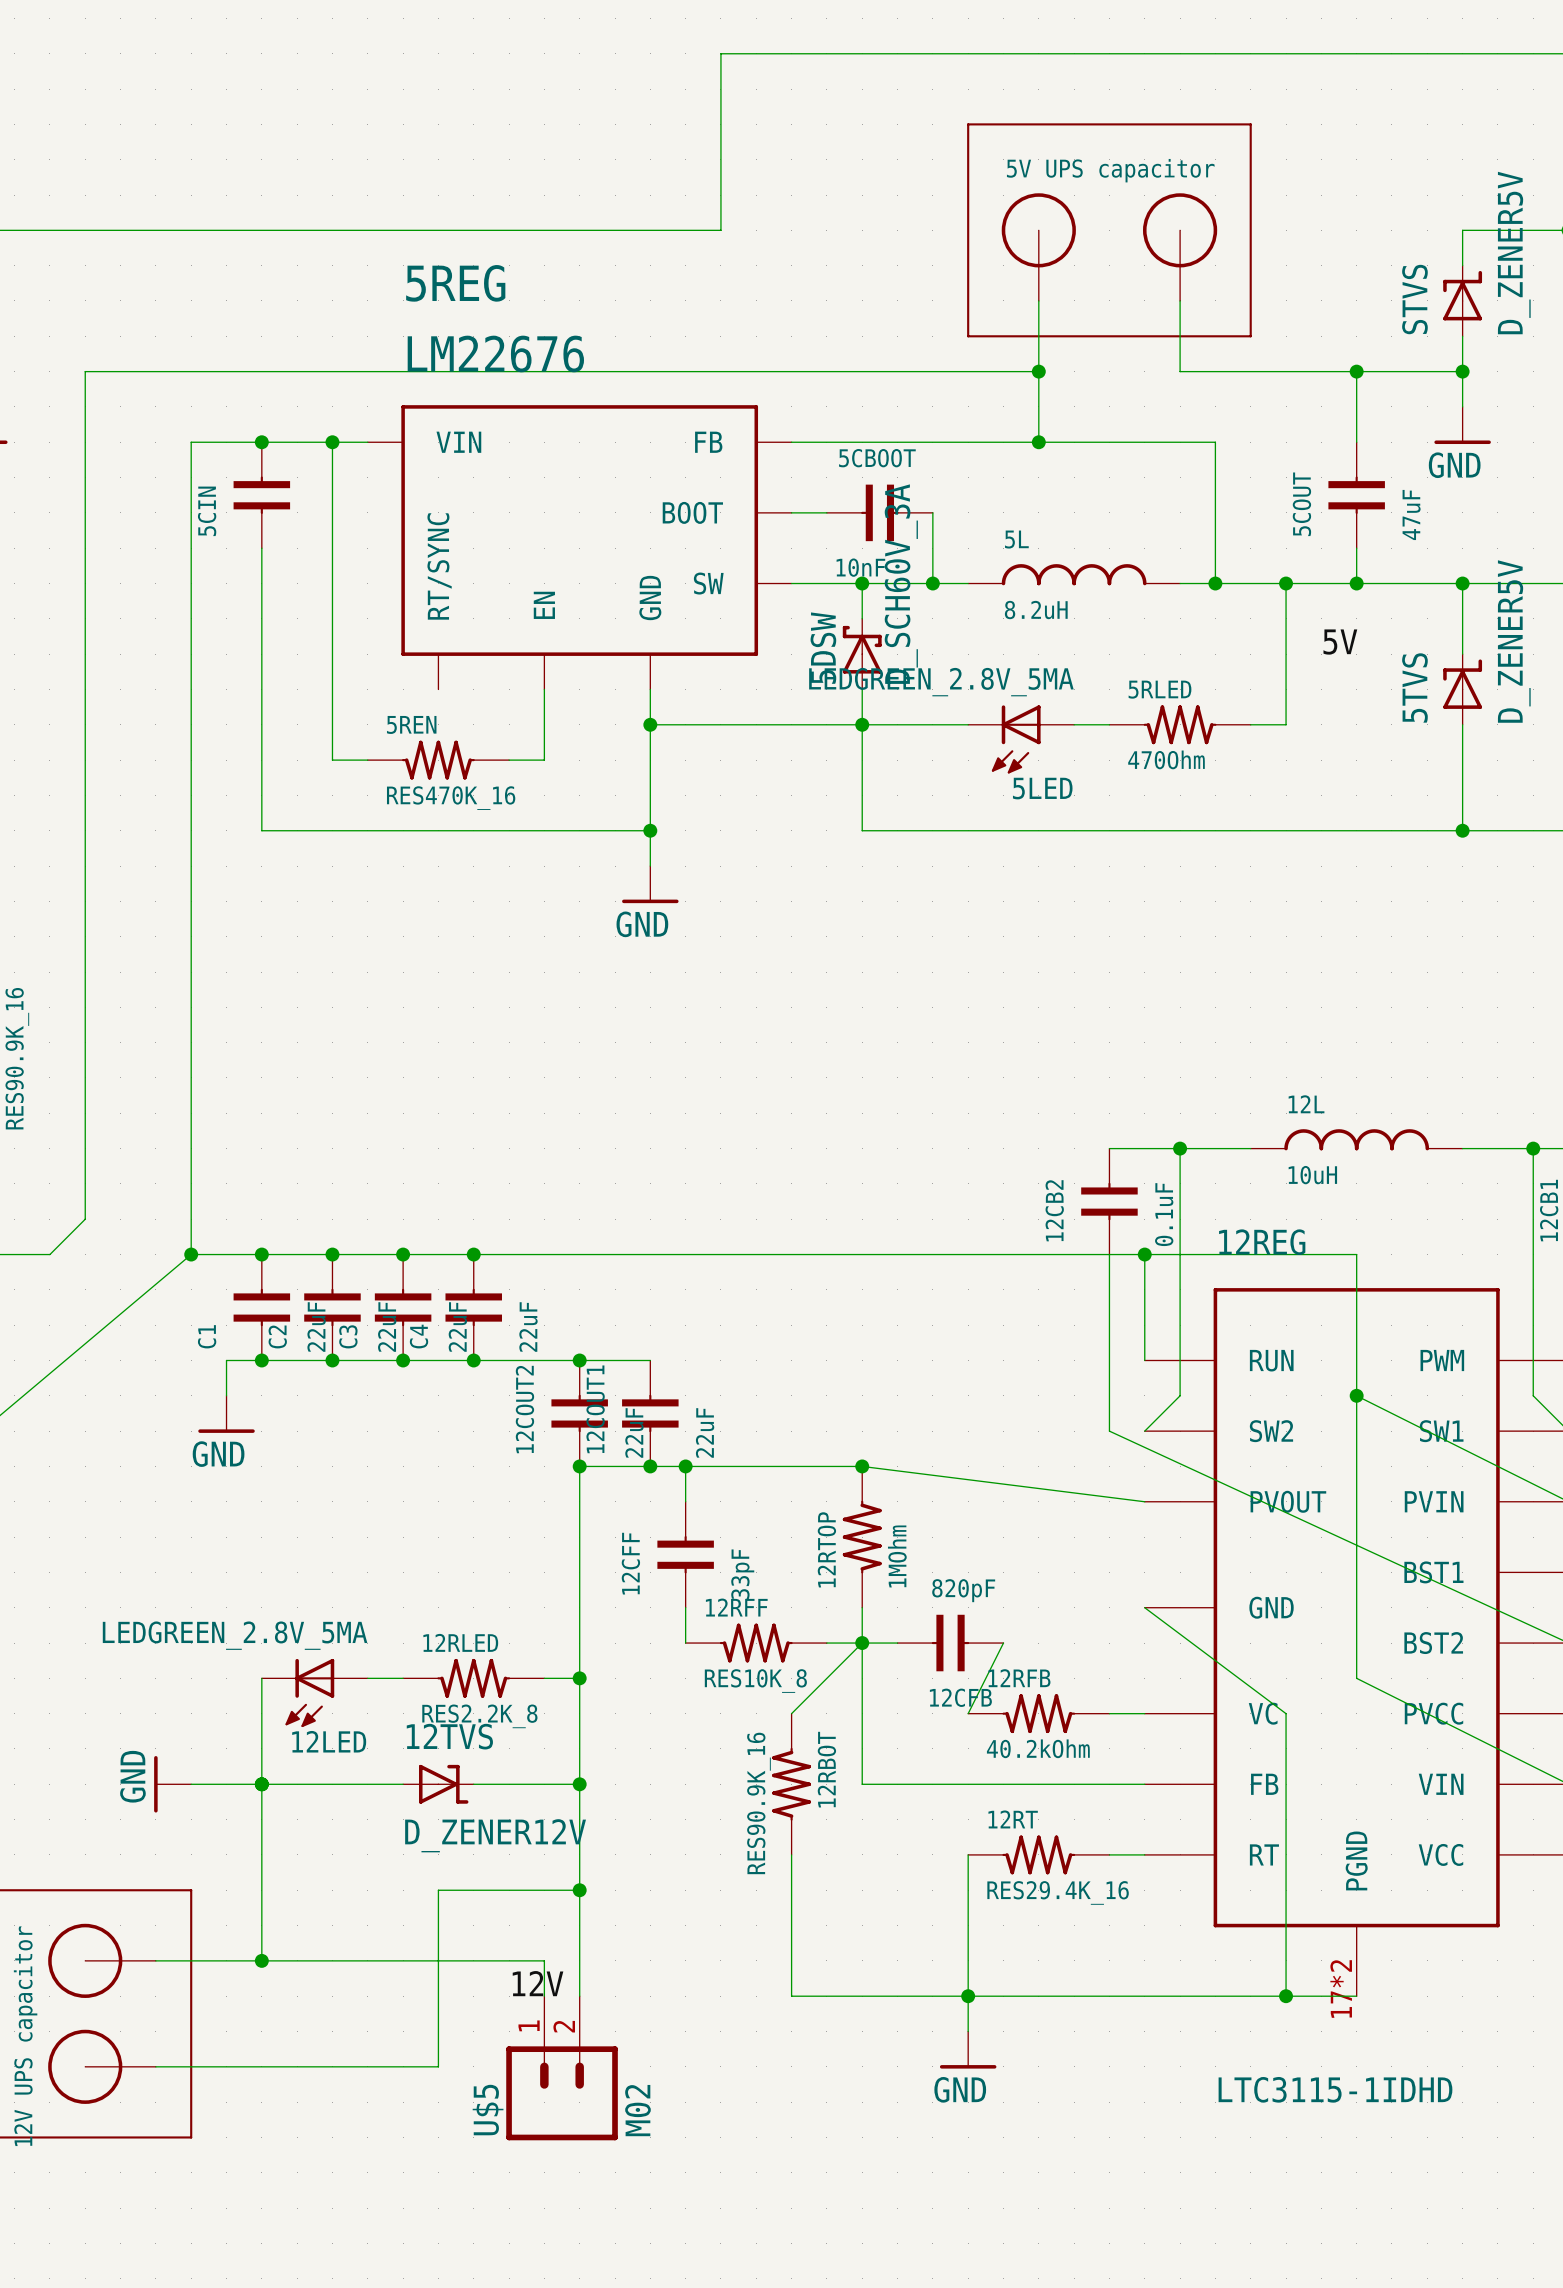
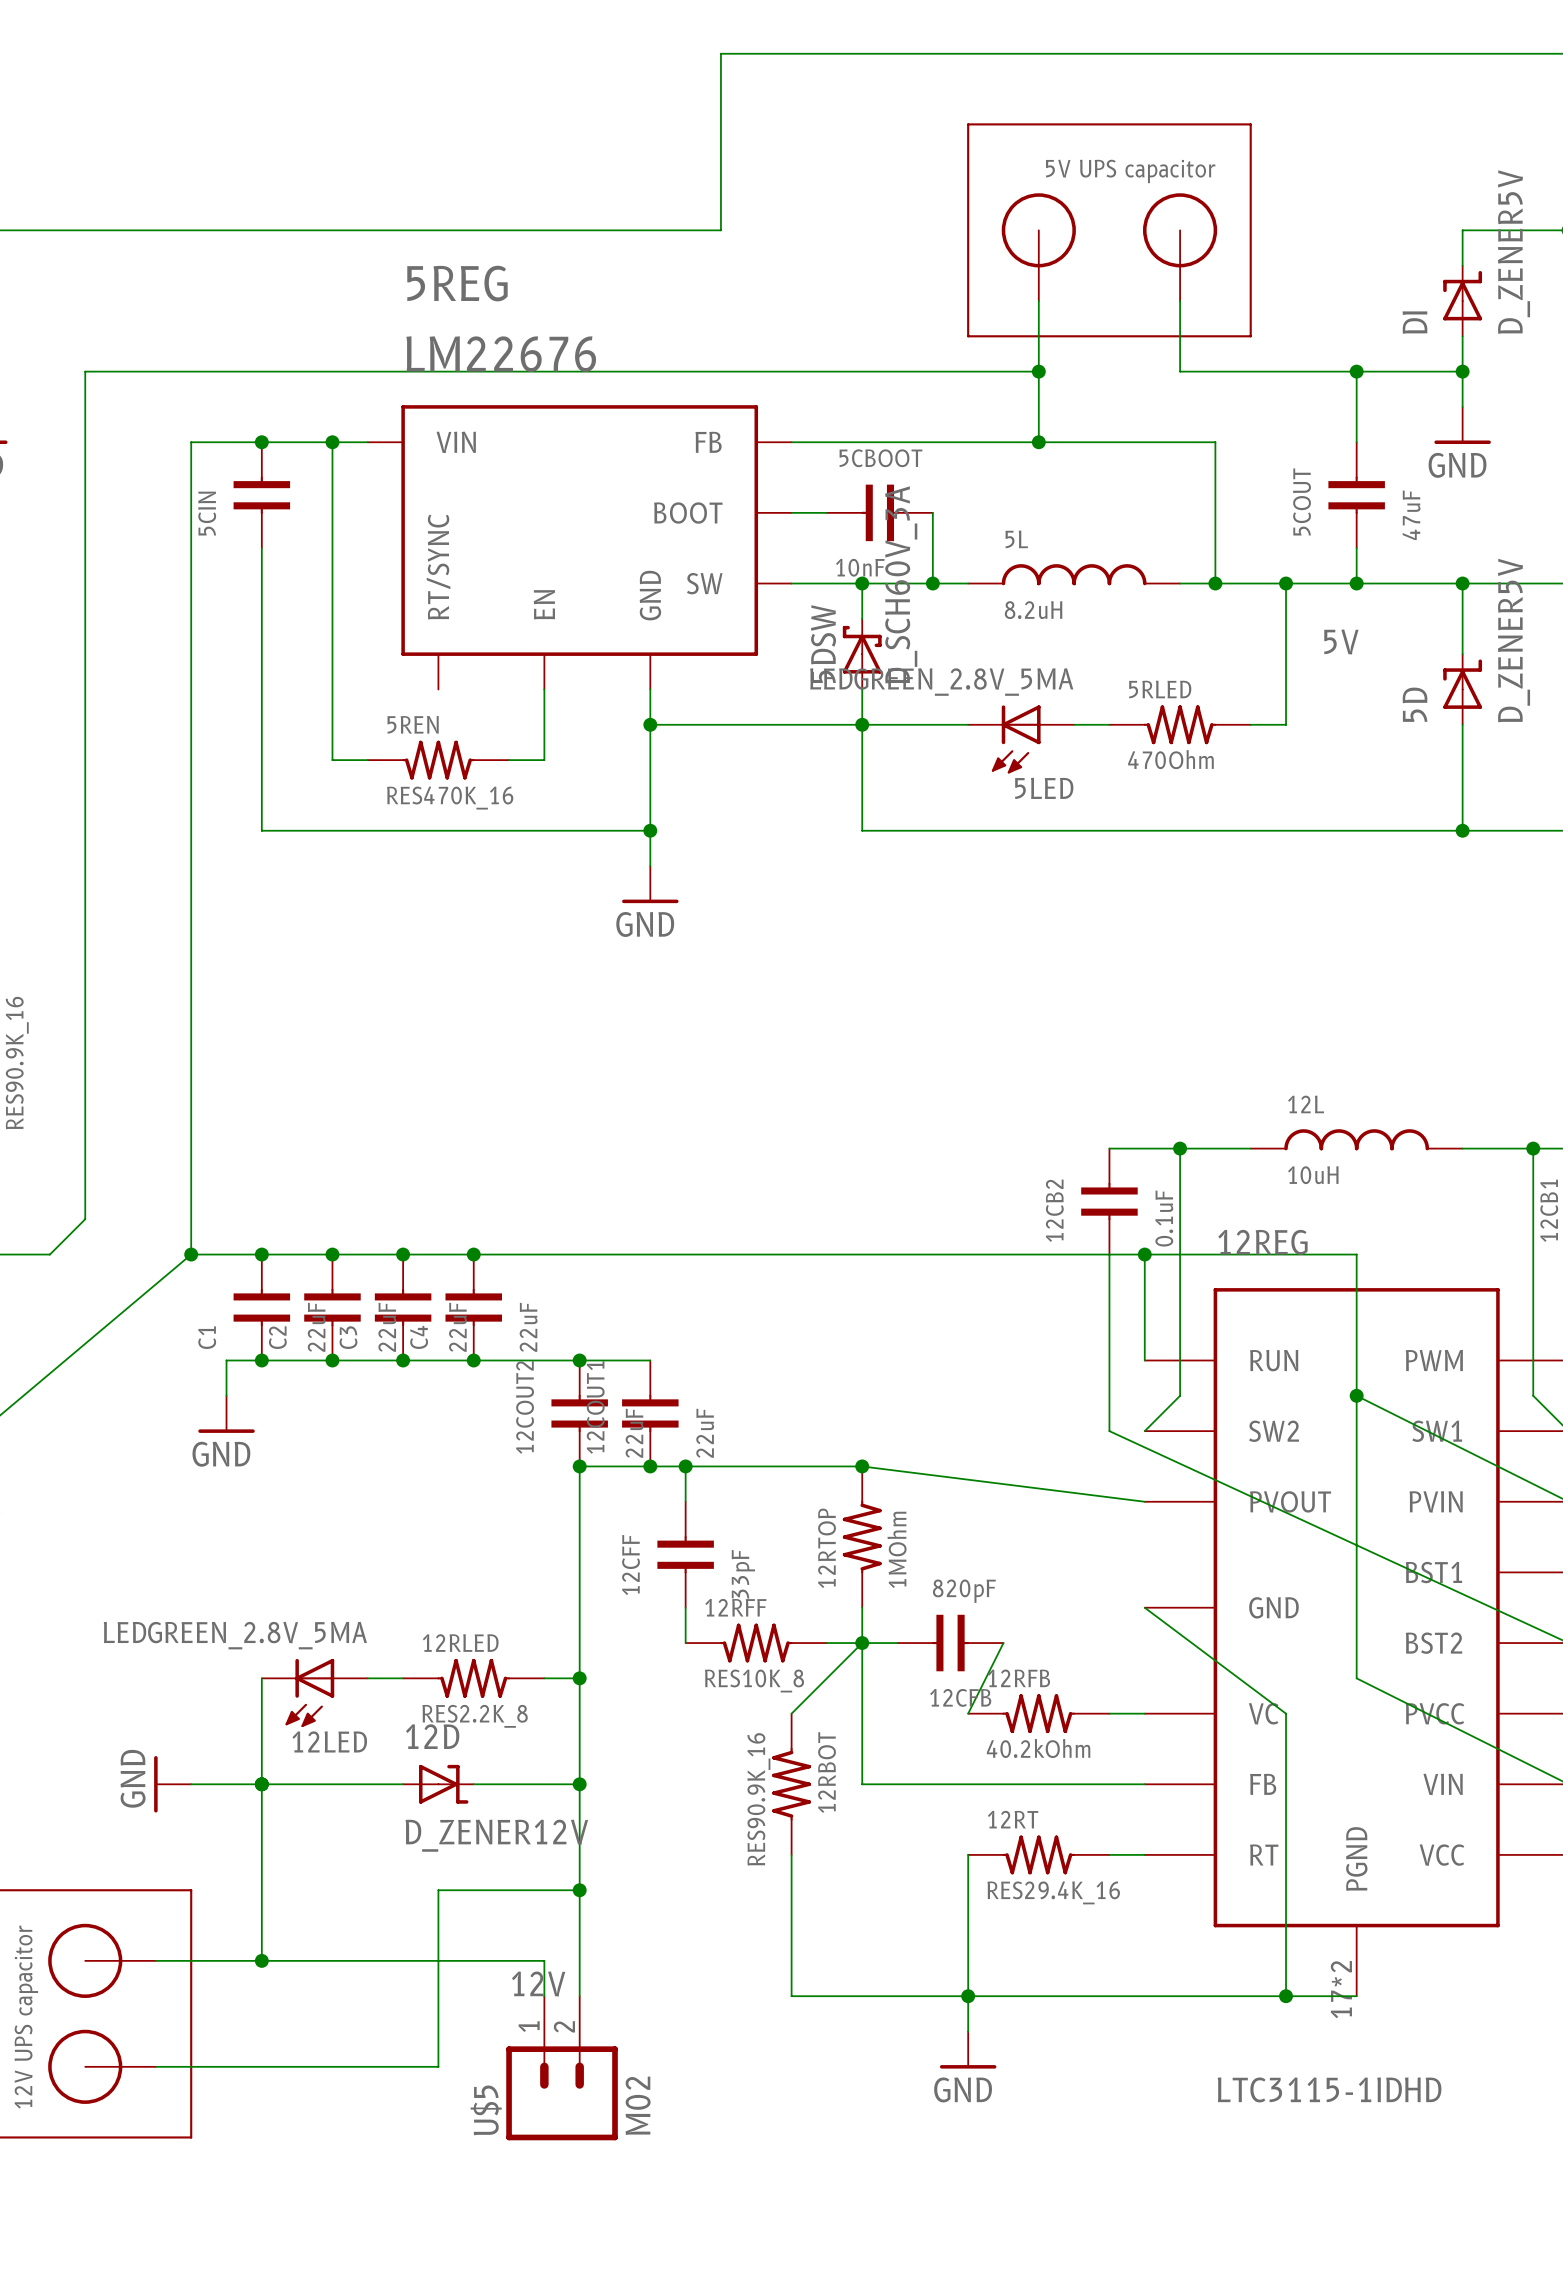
STVS name: STVS (1414, 299) -> DI (1414, 322)
5TVS name: 5TVS (1414, 687) -> 5D (1415, 704)
12TVS name: 12TVS (449, 1736) -> 12D (432, 1736)

